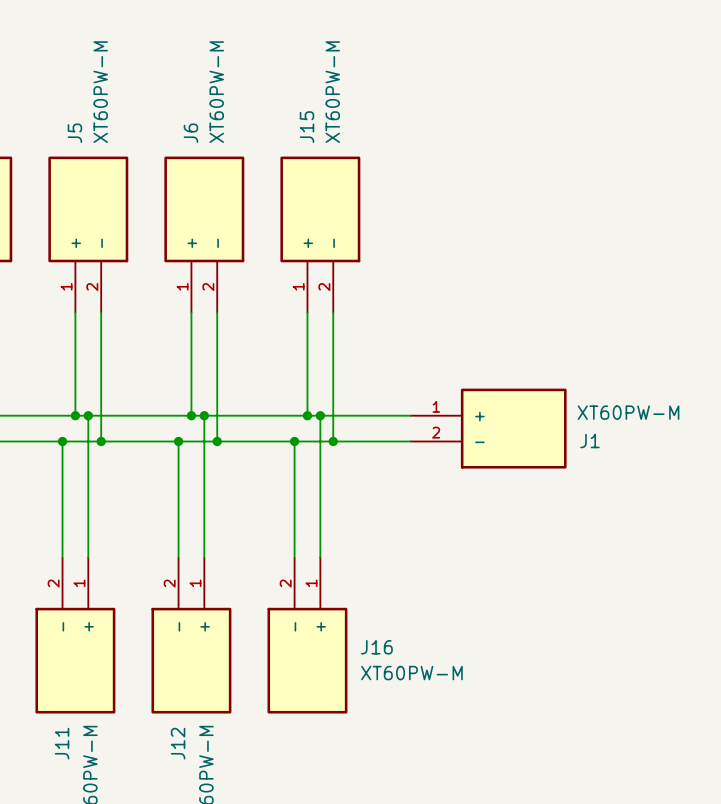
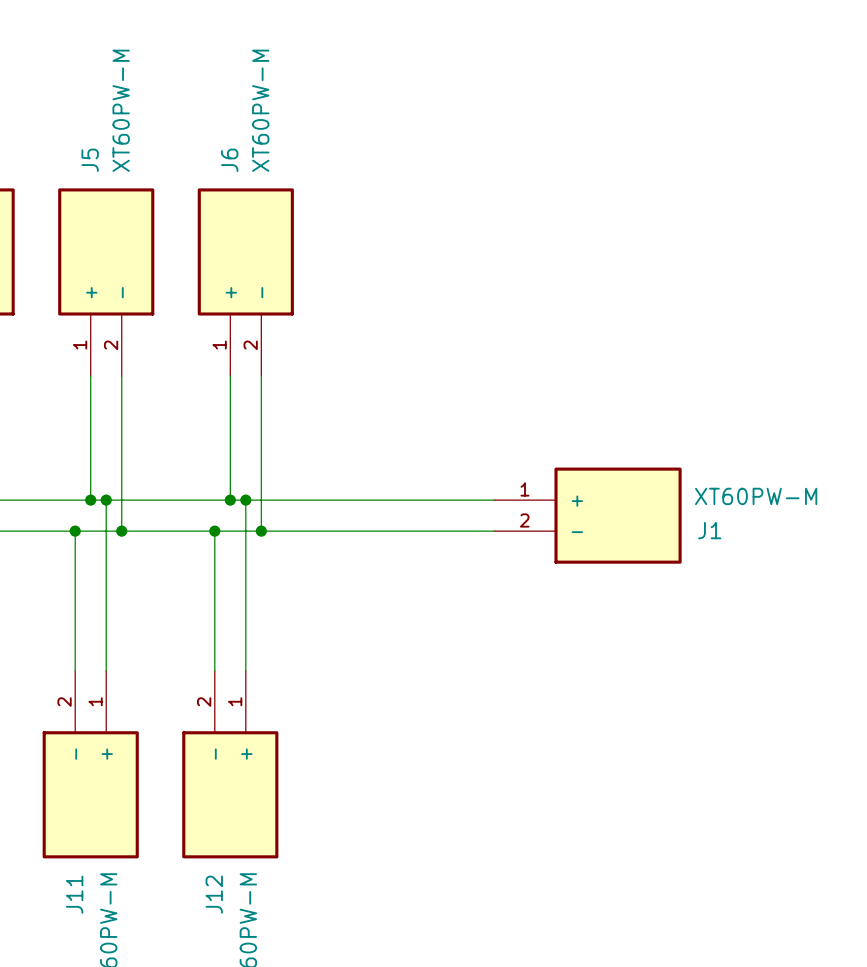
J15: XT60PW-M (320, 234) -> none
wire: (307, 312) (307, 415) -> none
wire: (333, 312) (333, 441) -> none
junction: (307, 415) -> none
wire: (320, 415) (320, 557) -> none
junction: (320, 415) -> none
wire: (294, 441) (294, 557) -> none
junction: (294, 441) -> none
junction: (333, 441) -> none
J16: XT60PW-M (307, 635) -> none

